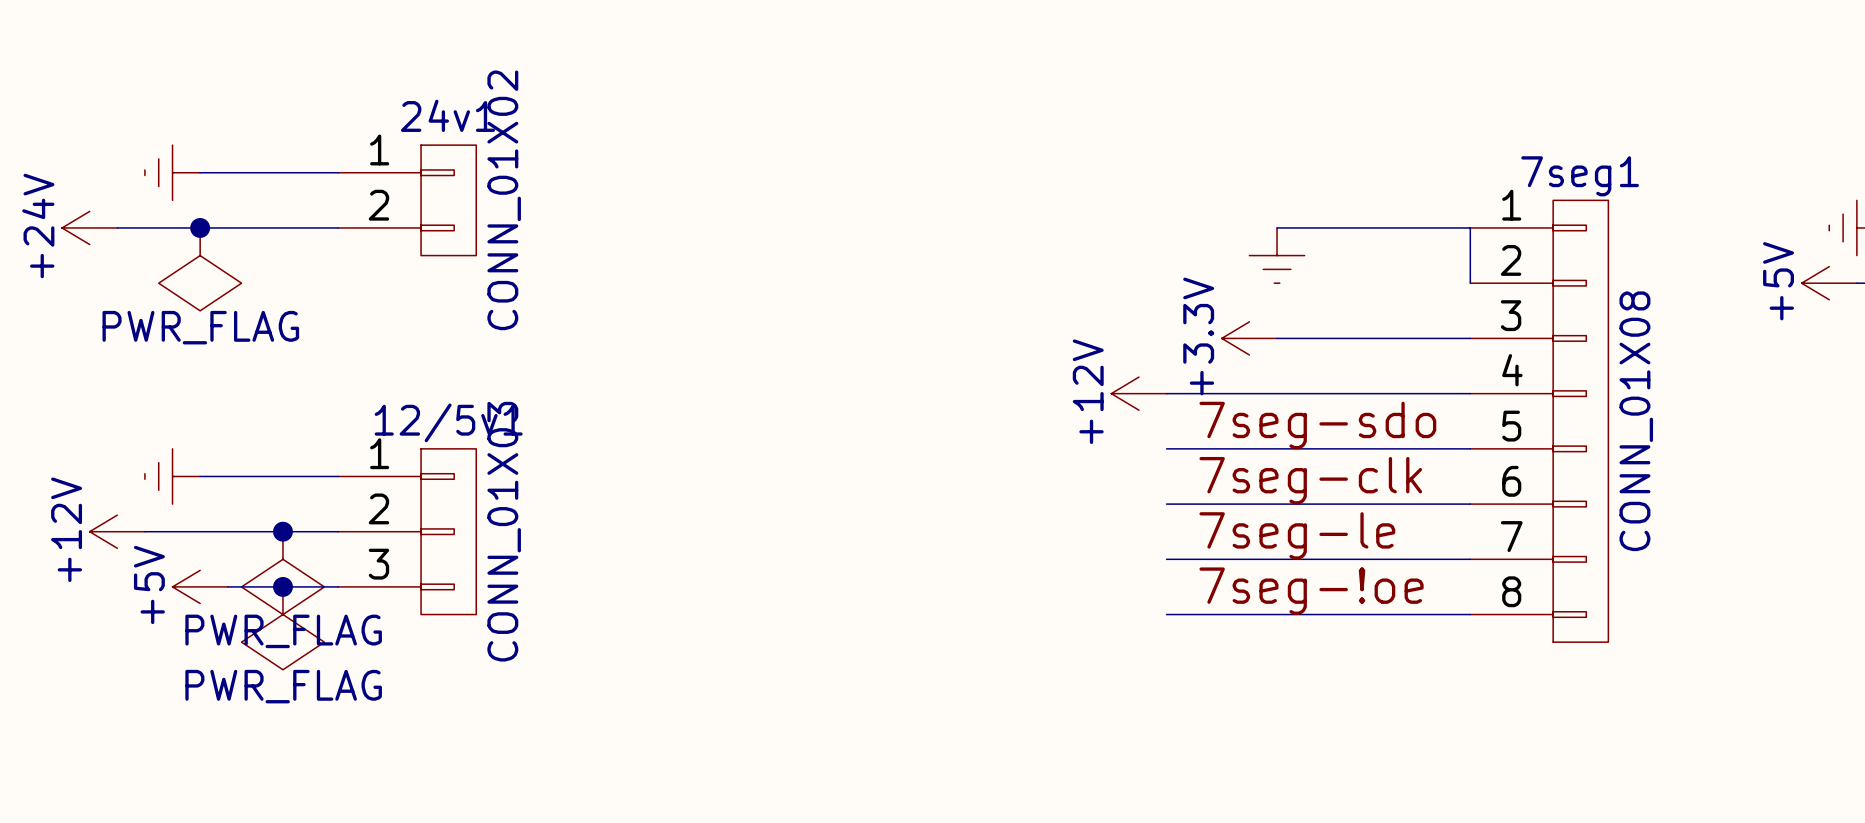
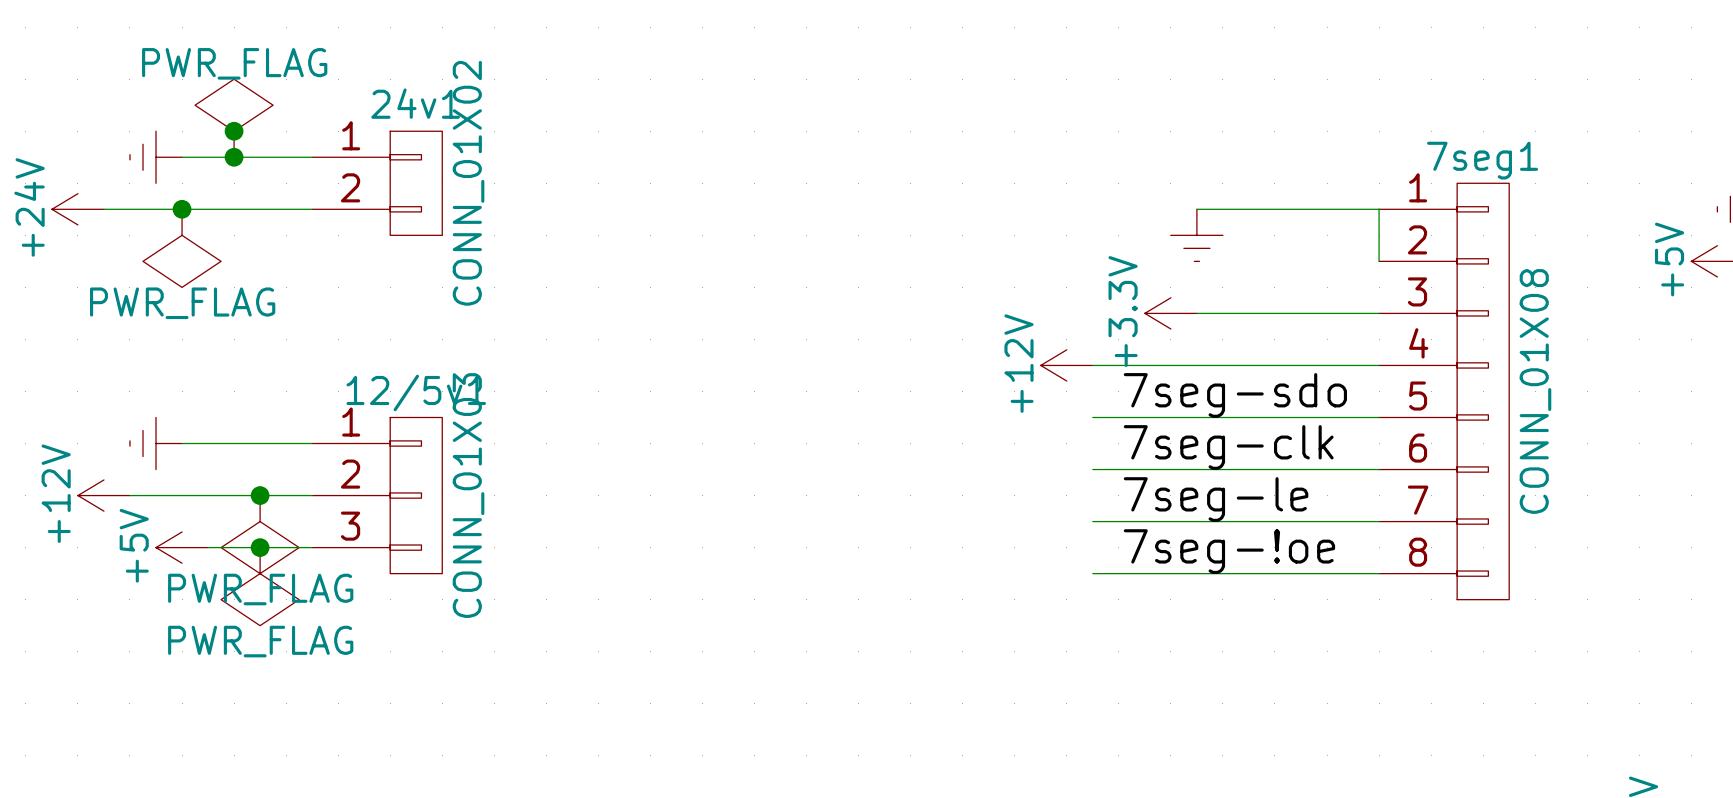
power symbol: none -> PWR_FLAG (234, 118)
junction: none -> (234, 131)
junction: none -> (234, 157)

